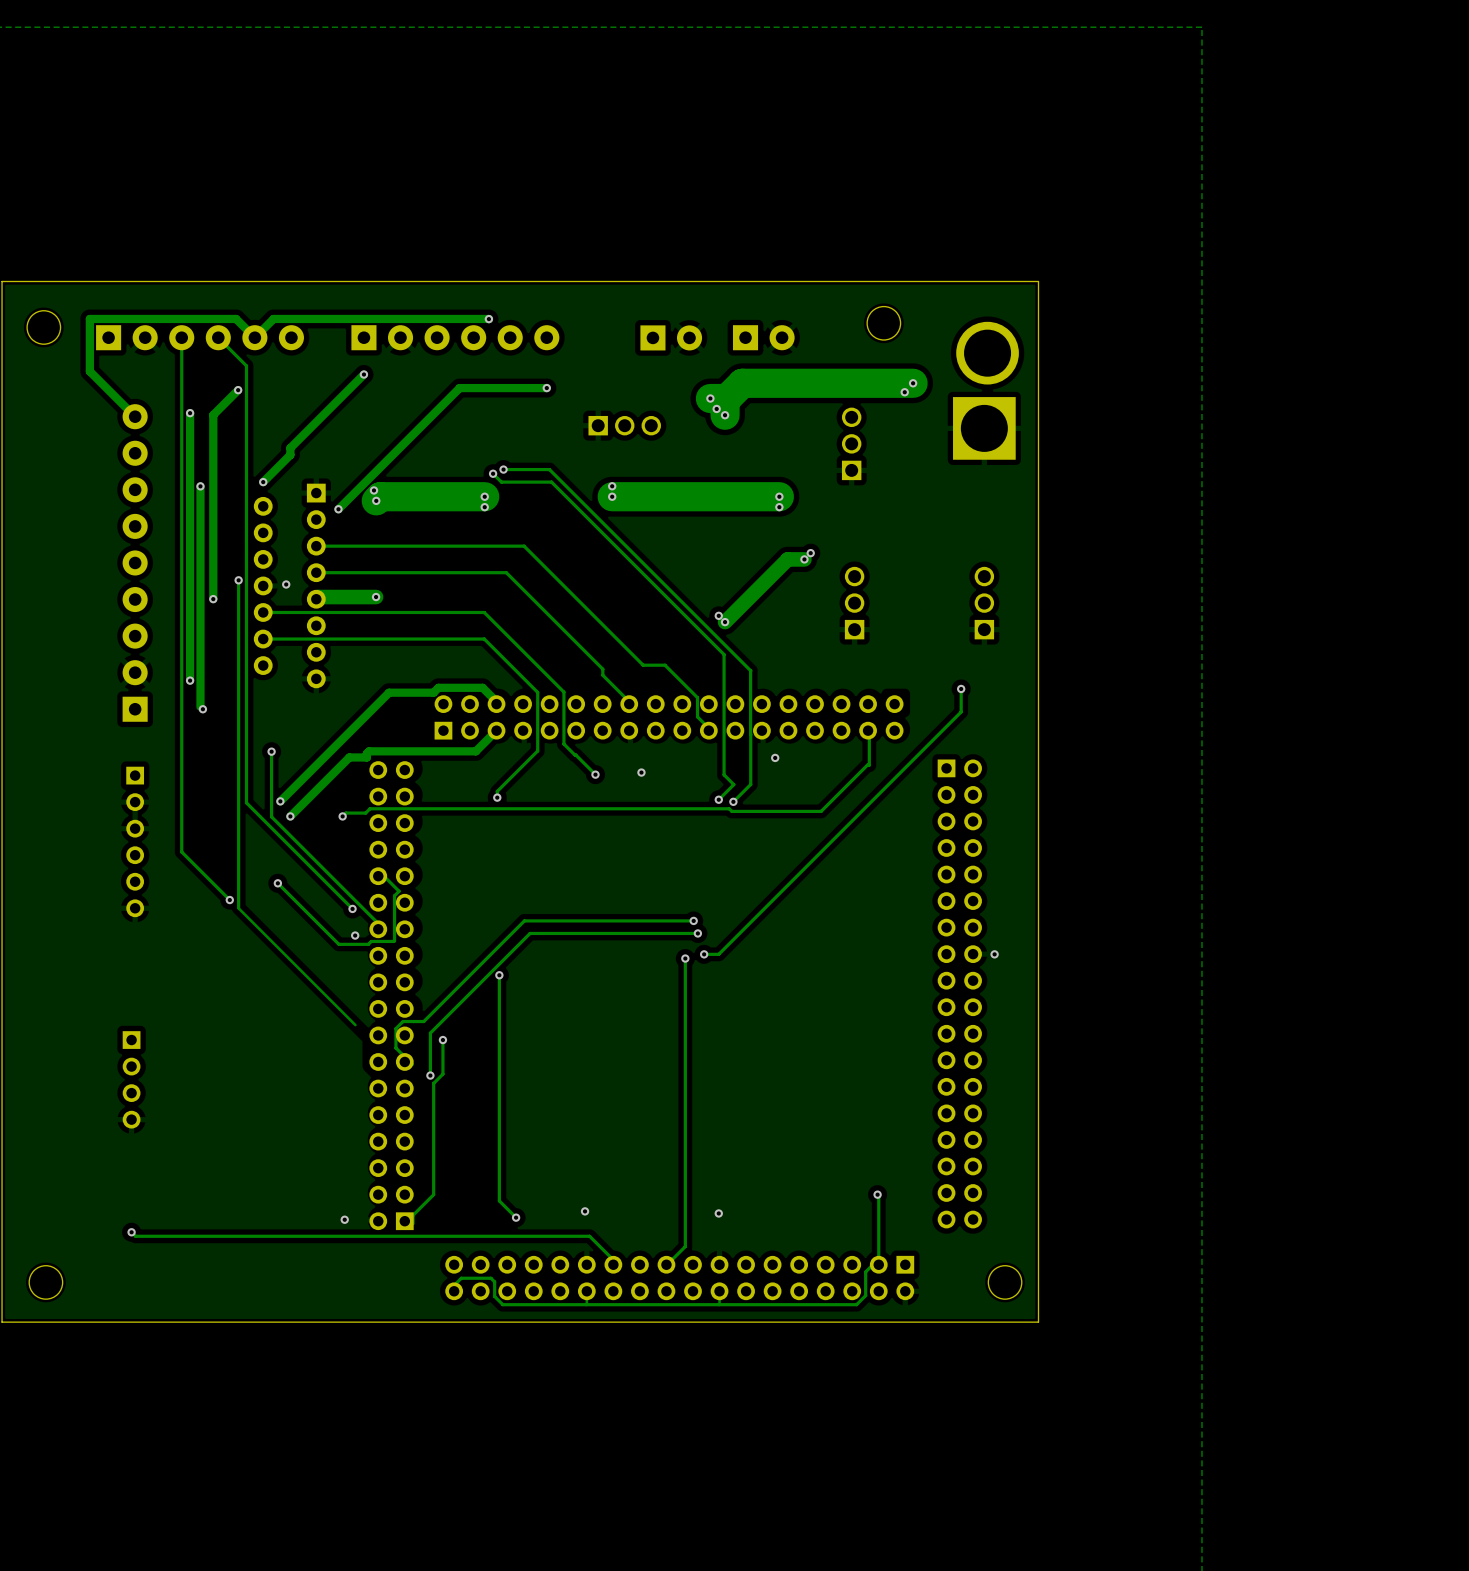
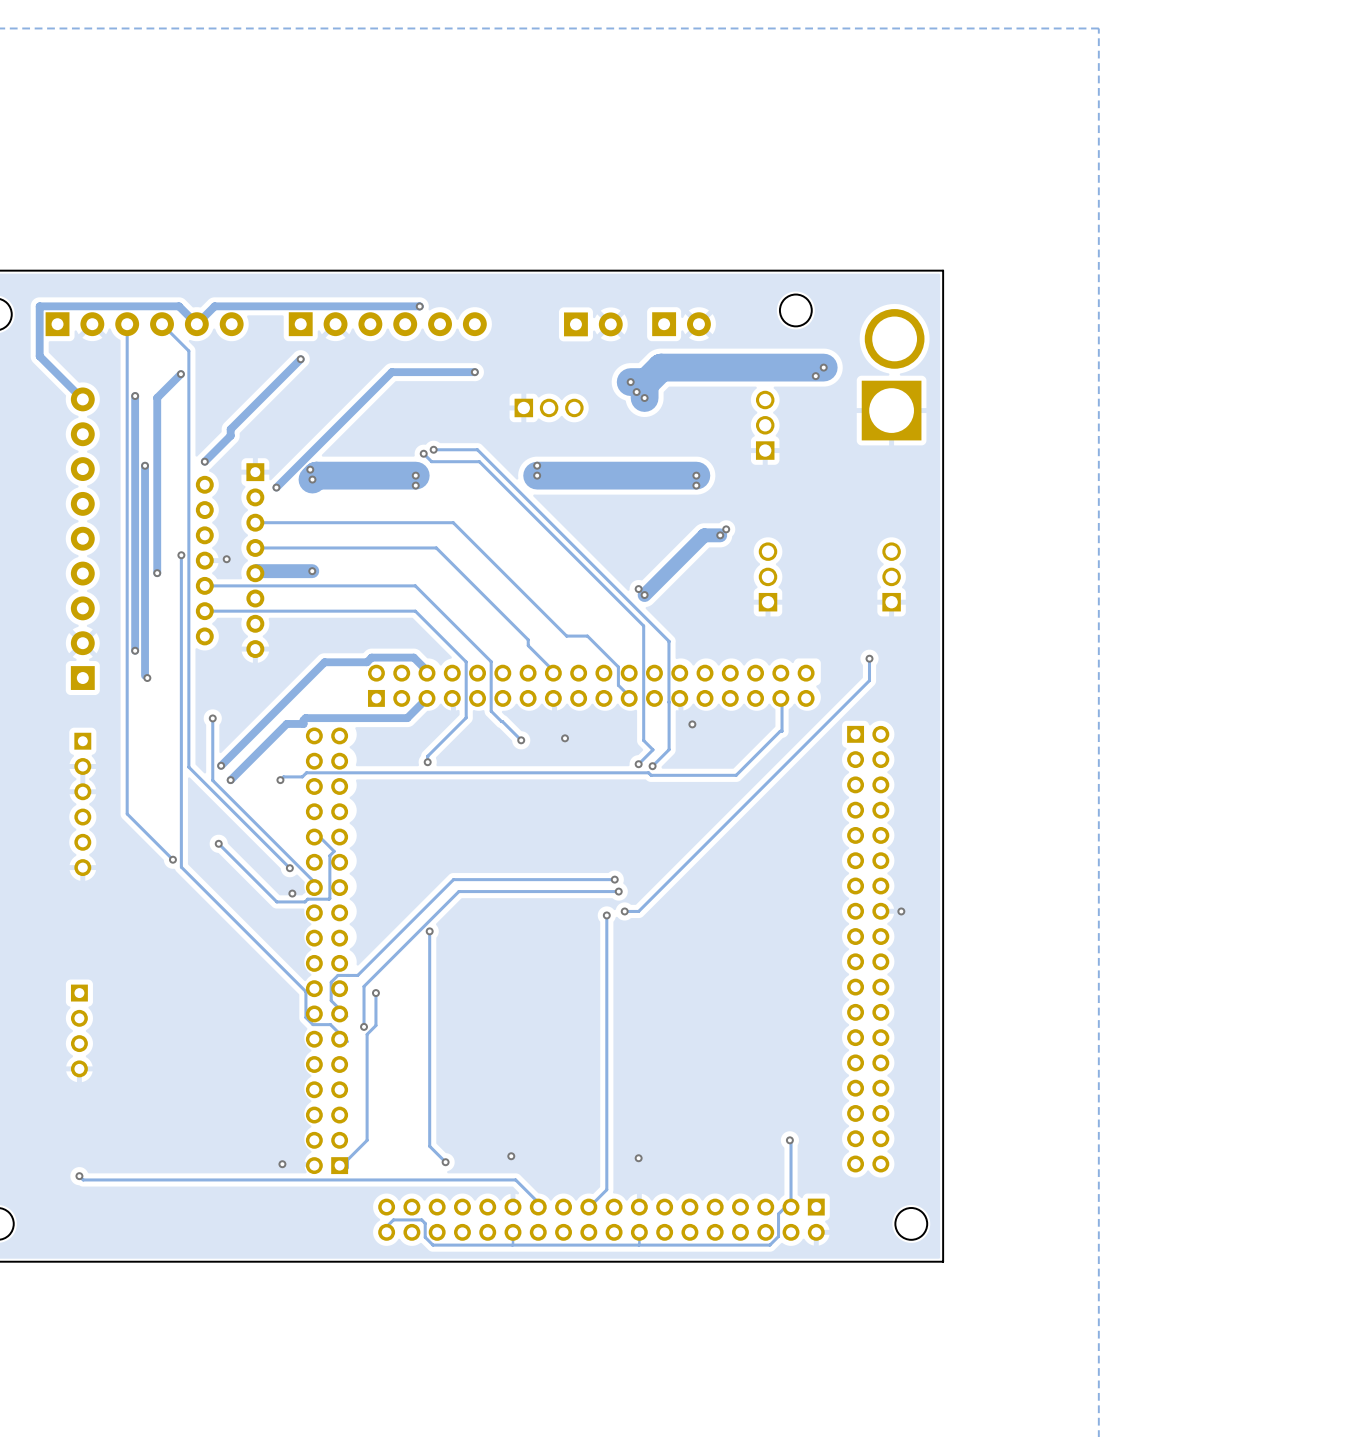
track: (238, 907) (355, 1025) -> (181, 867) (305, 991) (305, 1017) (312, 1024) (330, 1024) (347, 1041)

